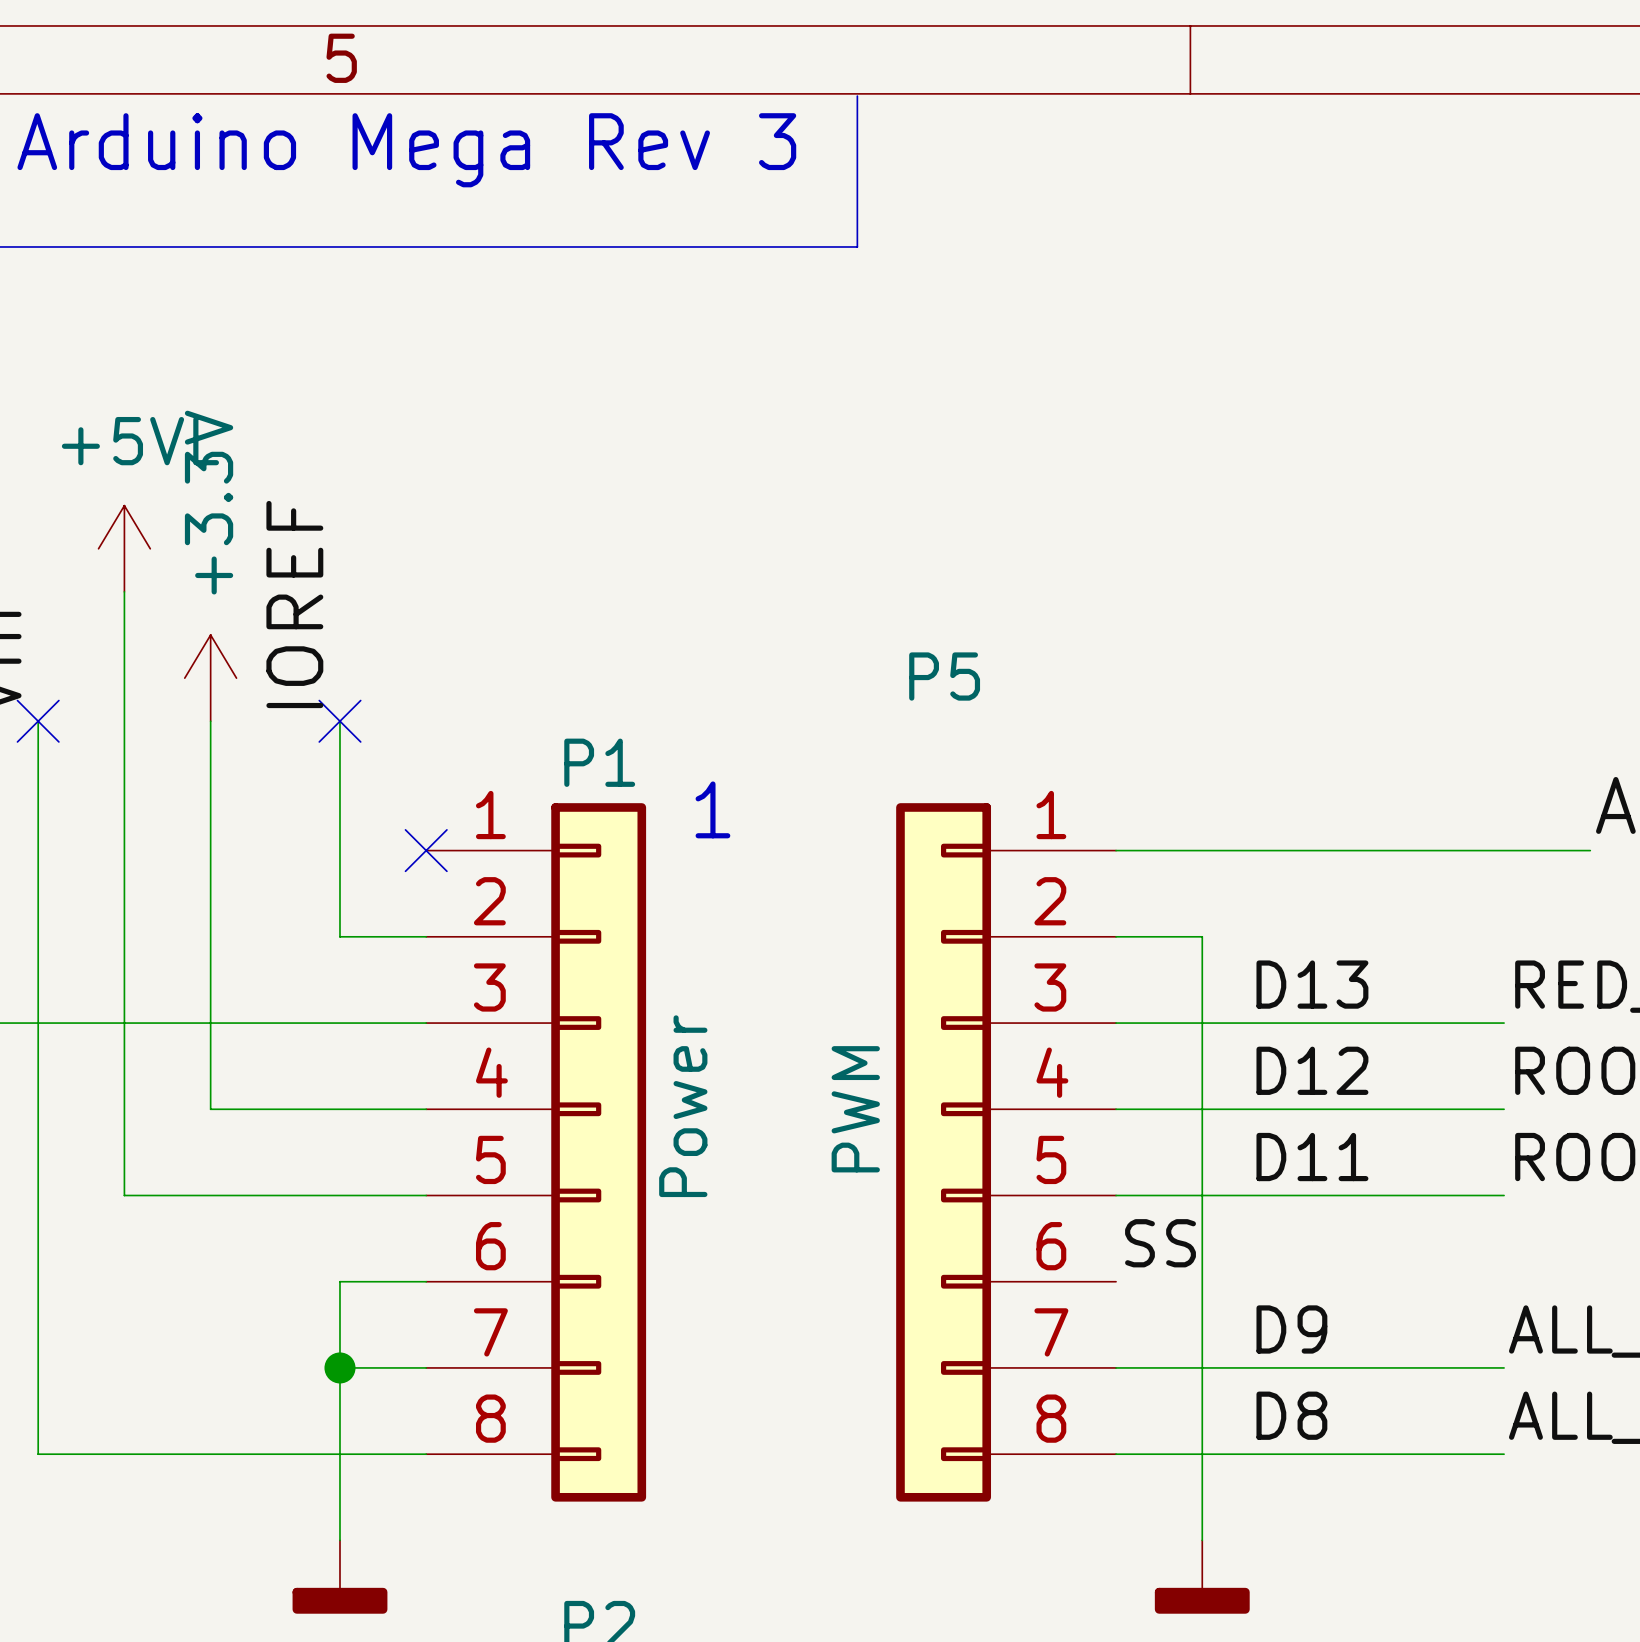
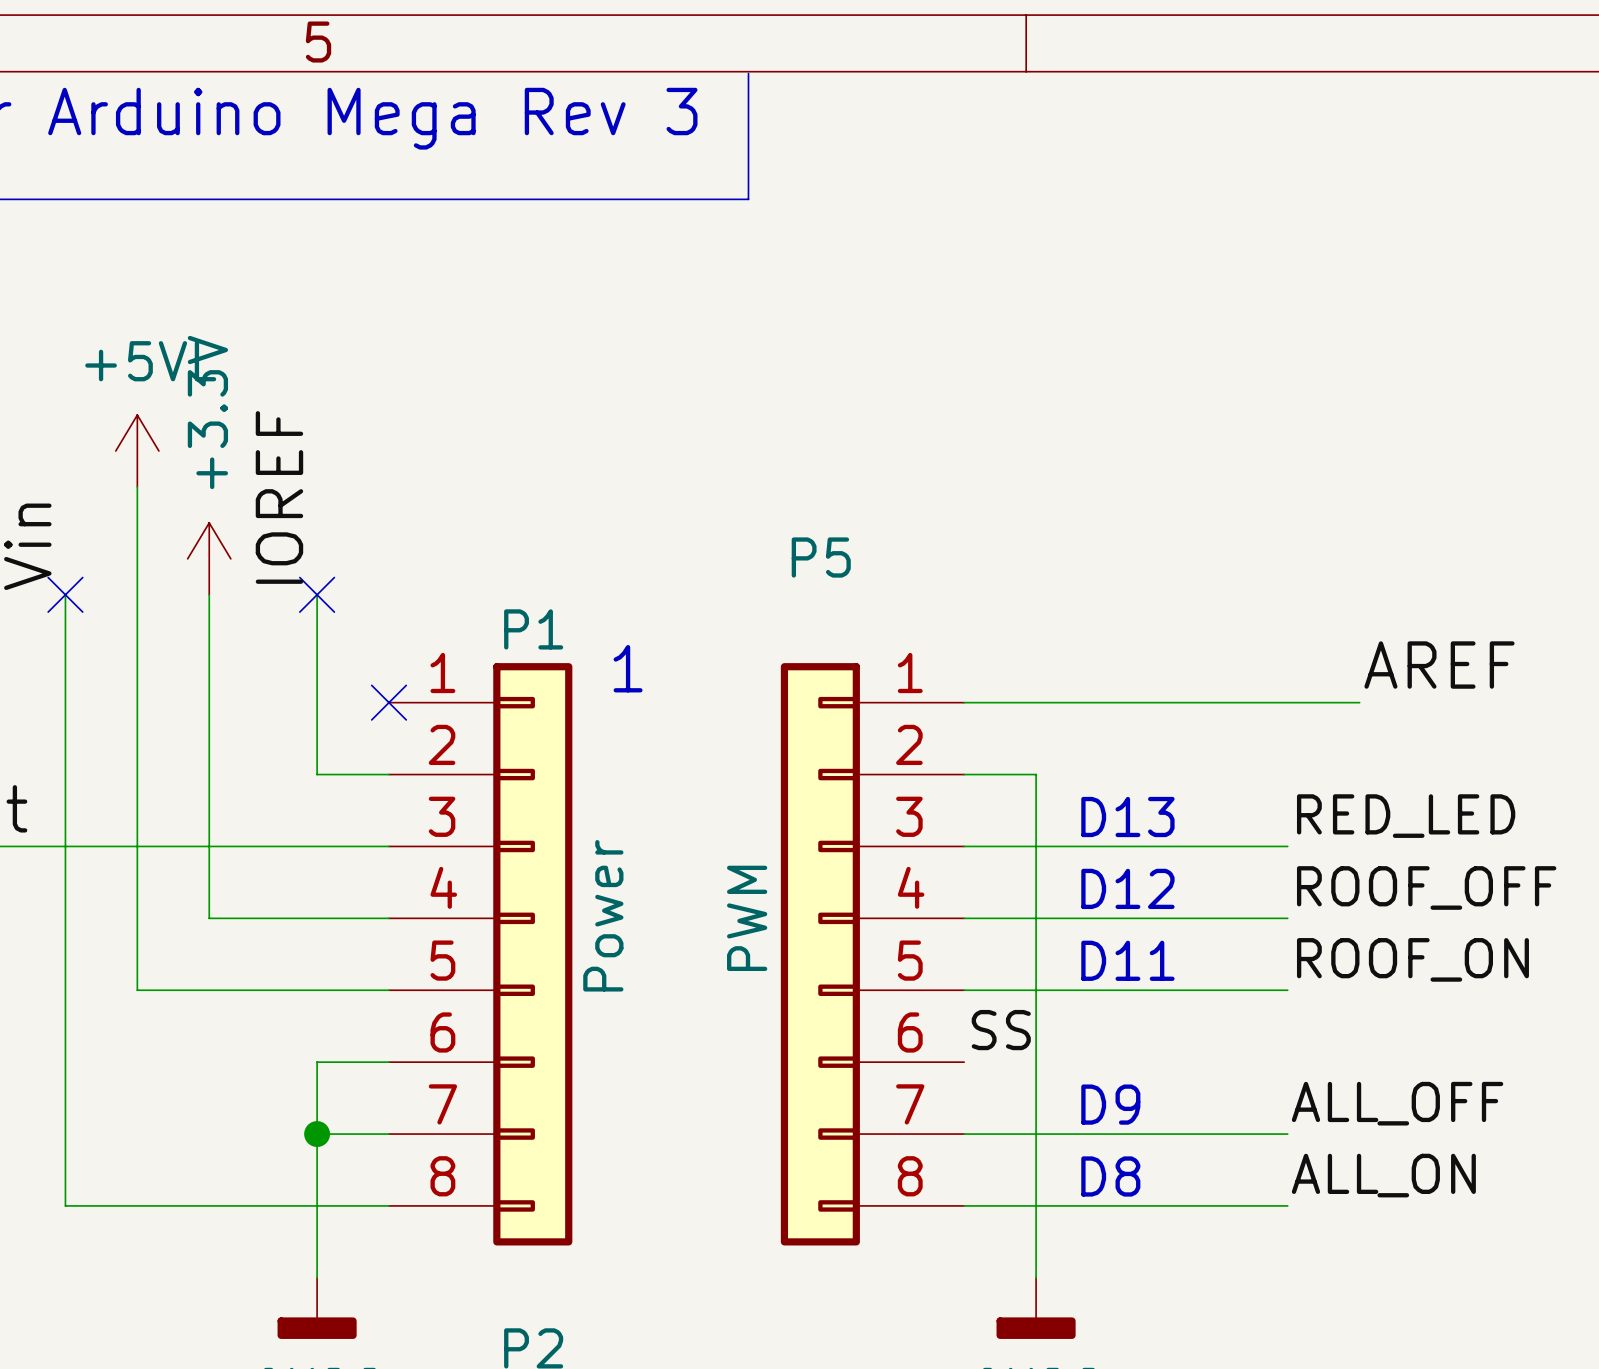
label: D13 (1312, 984) -> none
text: none -> D13 (1127, 817)
label: D12 (1312, 1070) -> none
text: none -> D12 (1127, 888)
label: D11 (1312, 1157) -> none
text: none -> D11 (1127, 960)
label: D9 (1291, 1329) -> none
text: none -> D9 (1110, 1104)
label: D8 (1291, 1415) -> none
text: none -> D8 (1110, 1176)

